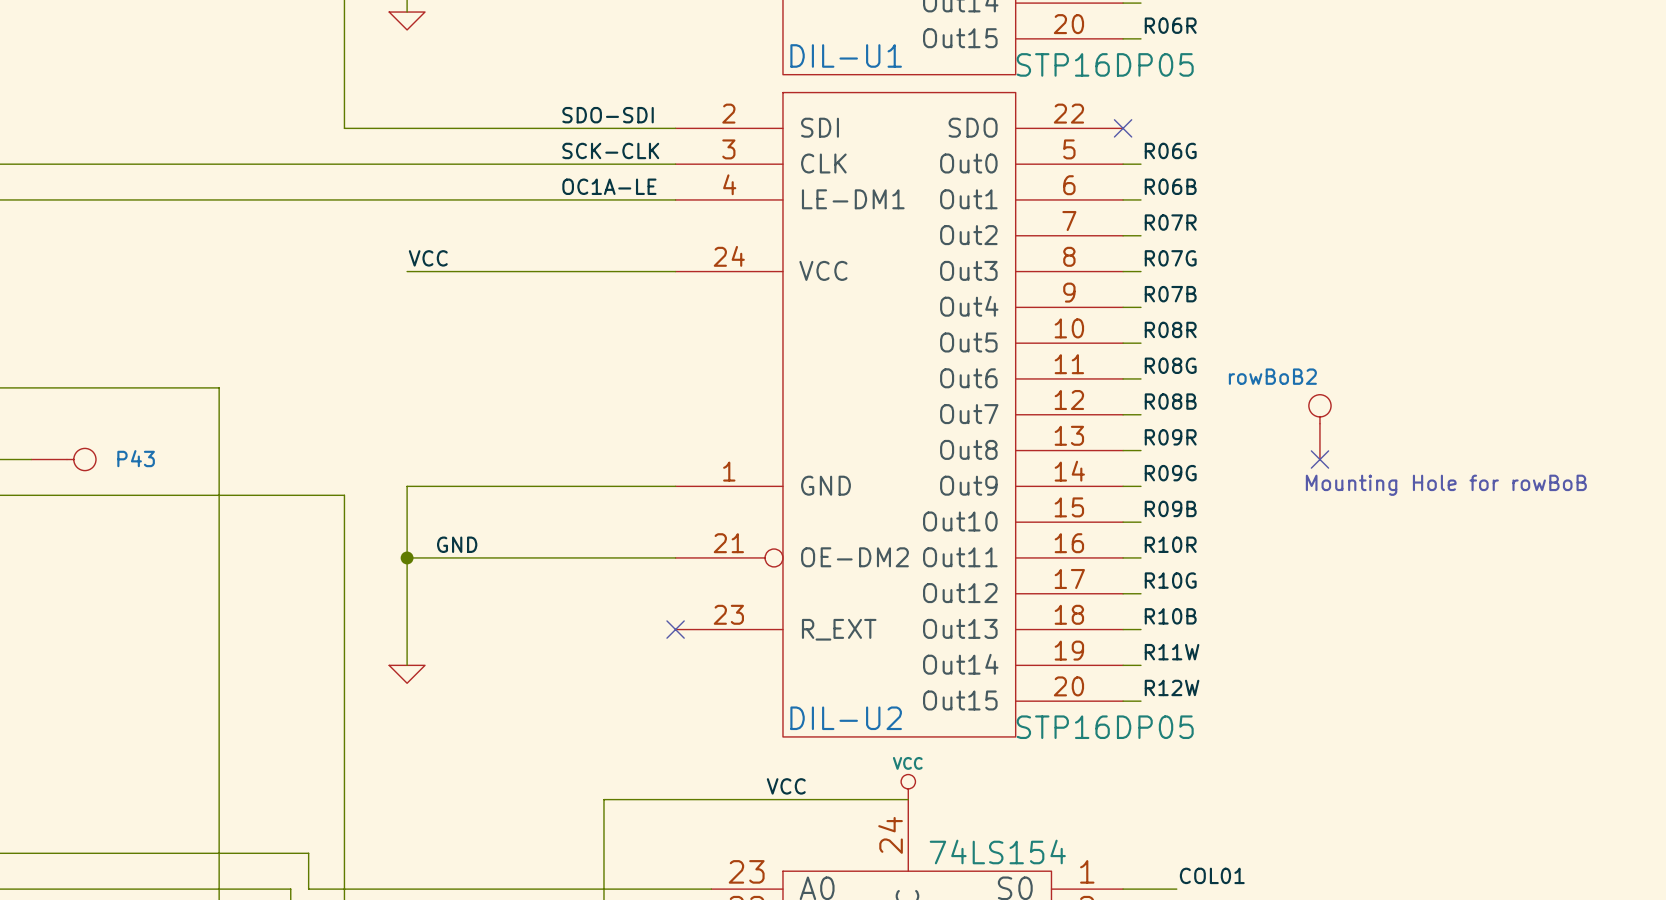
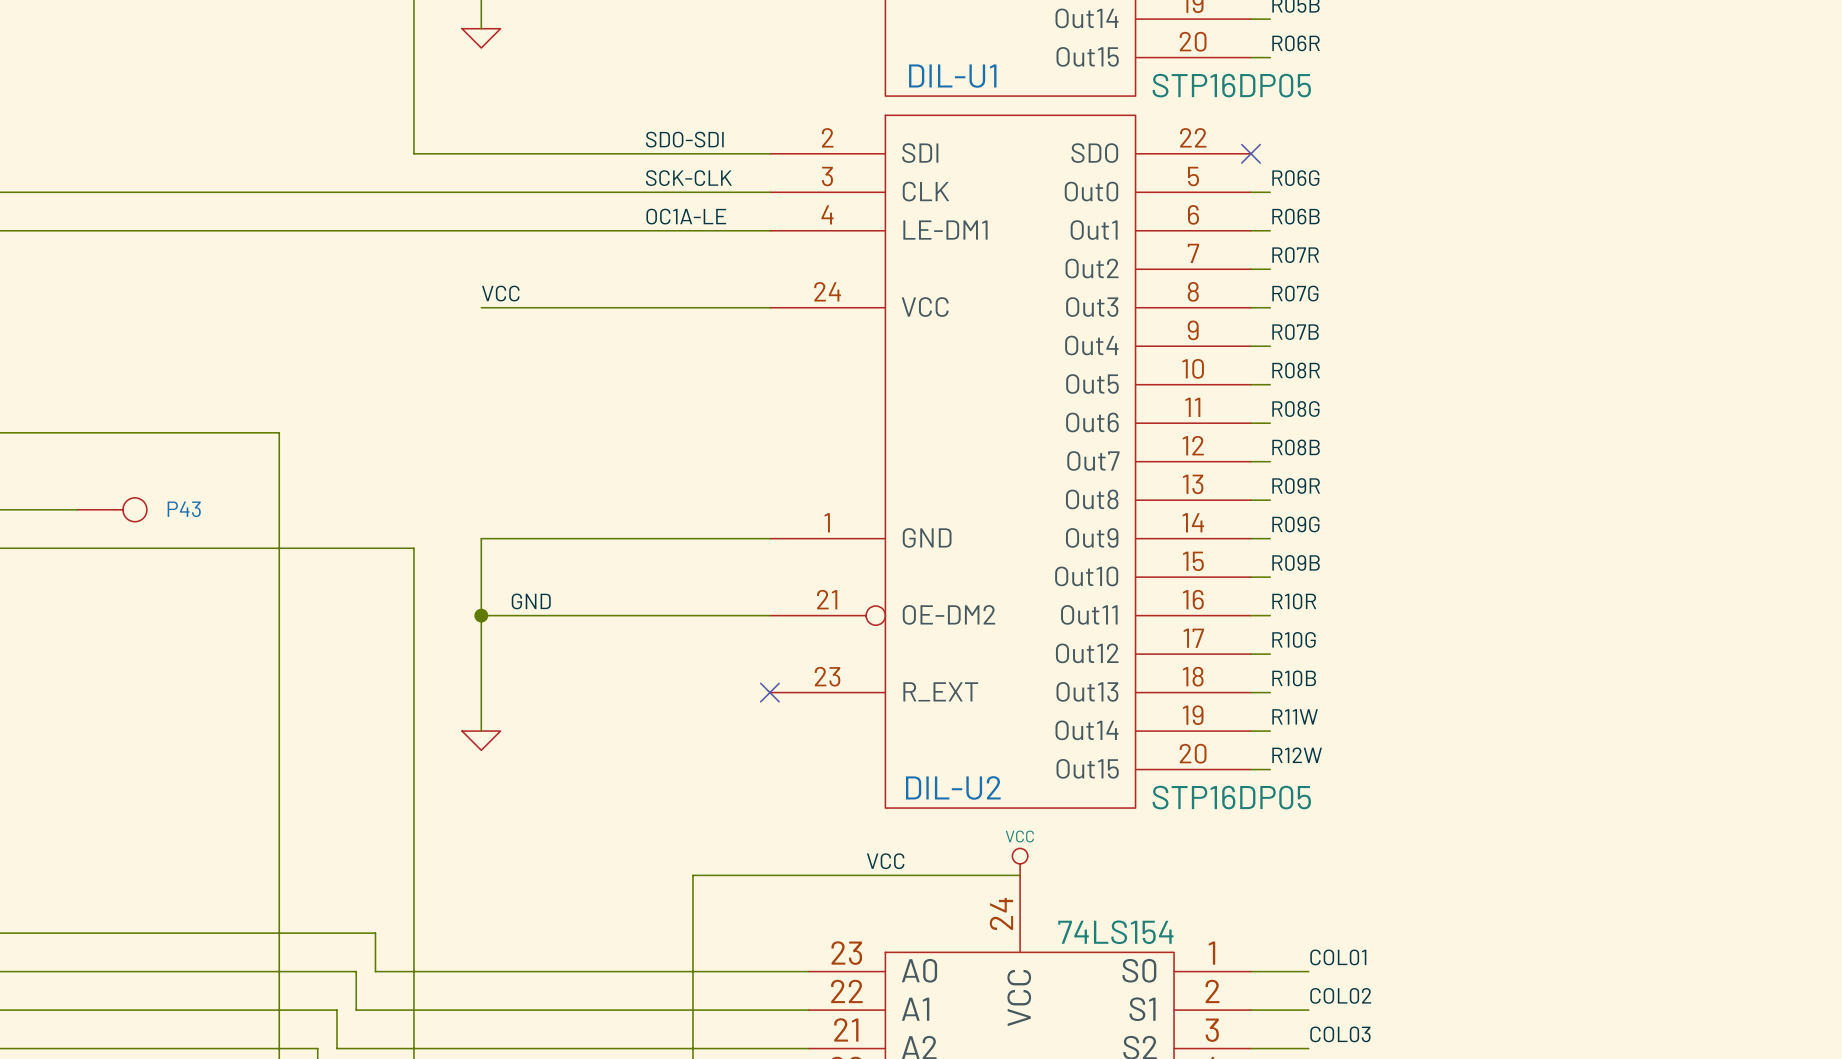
rowBoB2: (1319, 427) -> none
no-connect mark: (1319, 459) -> none
text: Mounting Hole for rowBoB (1446, 485) -> none

